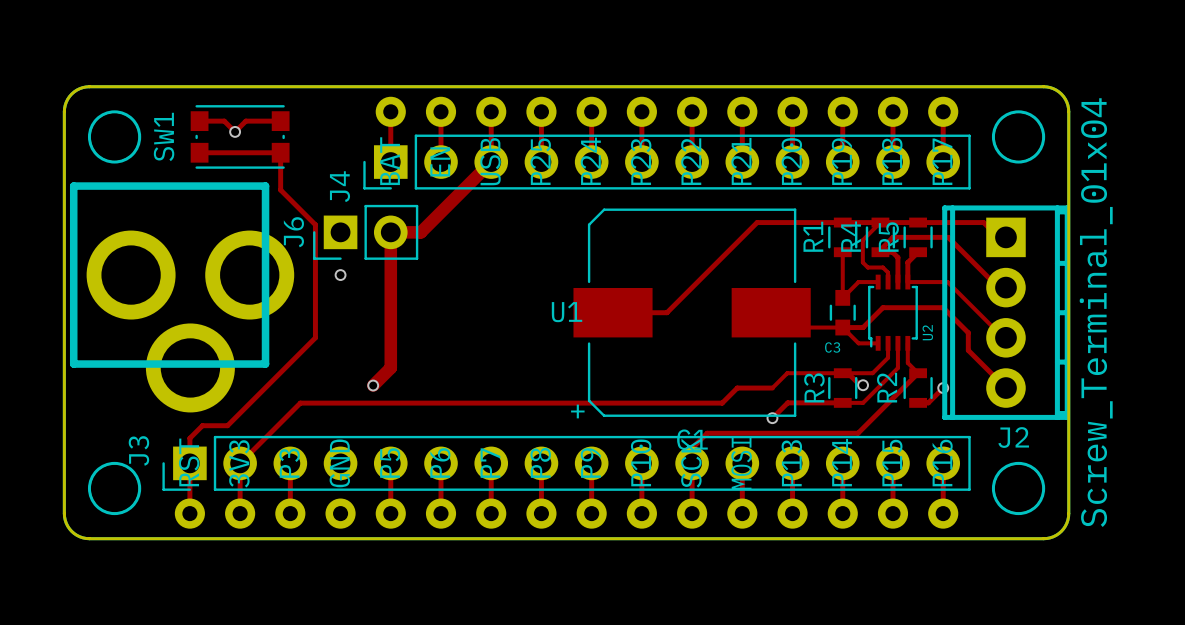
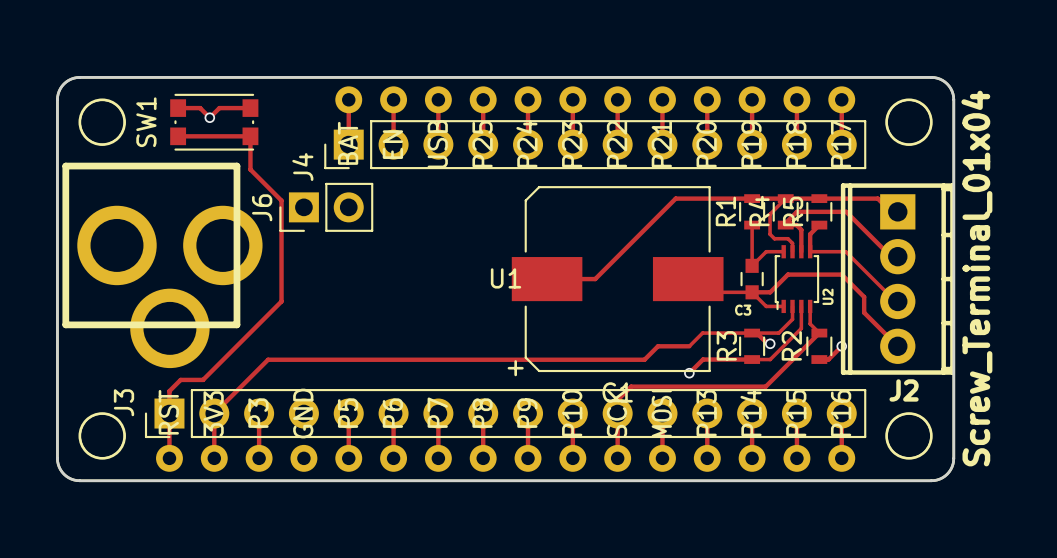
track: (491, 162) (420, 232) (390, 232) (390, 367) (373, 385) -> none
via: (340, 275) -> none
via: (373, 385) -> none

